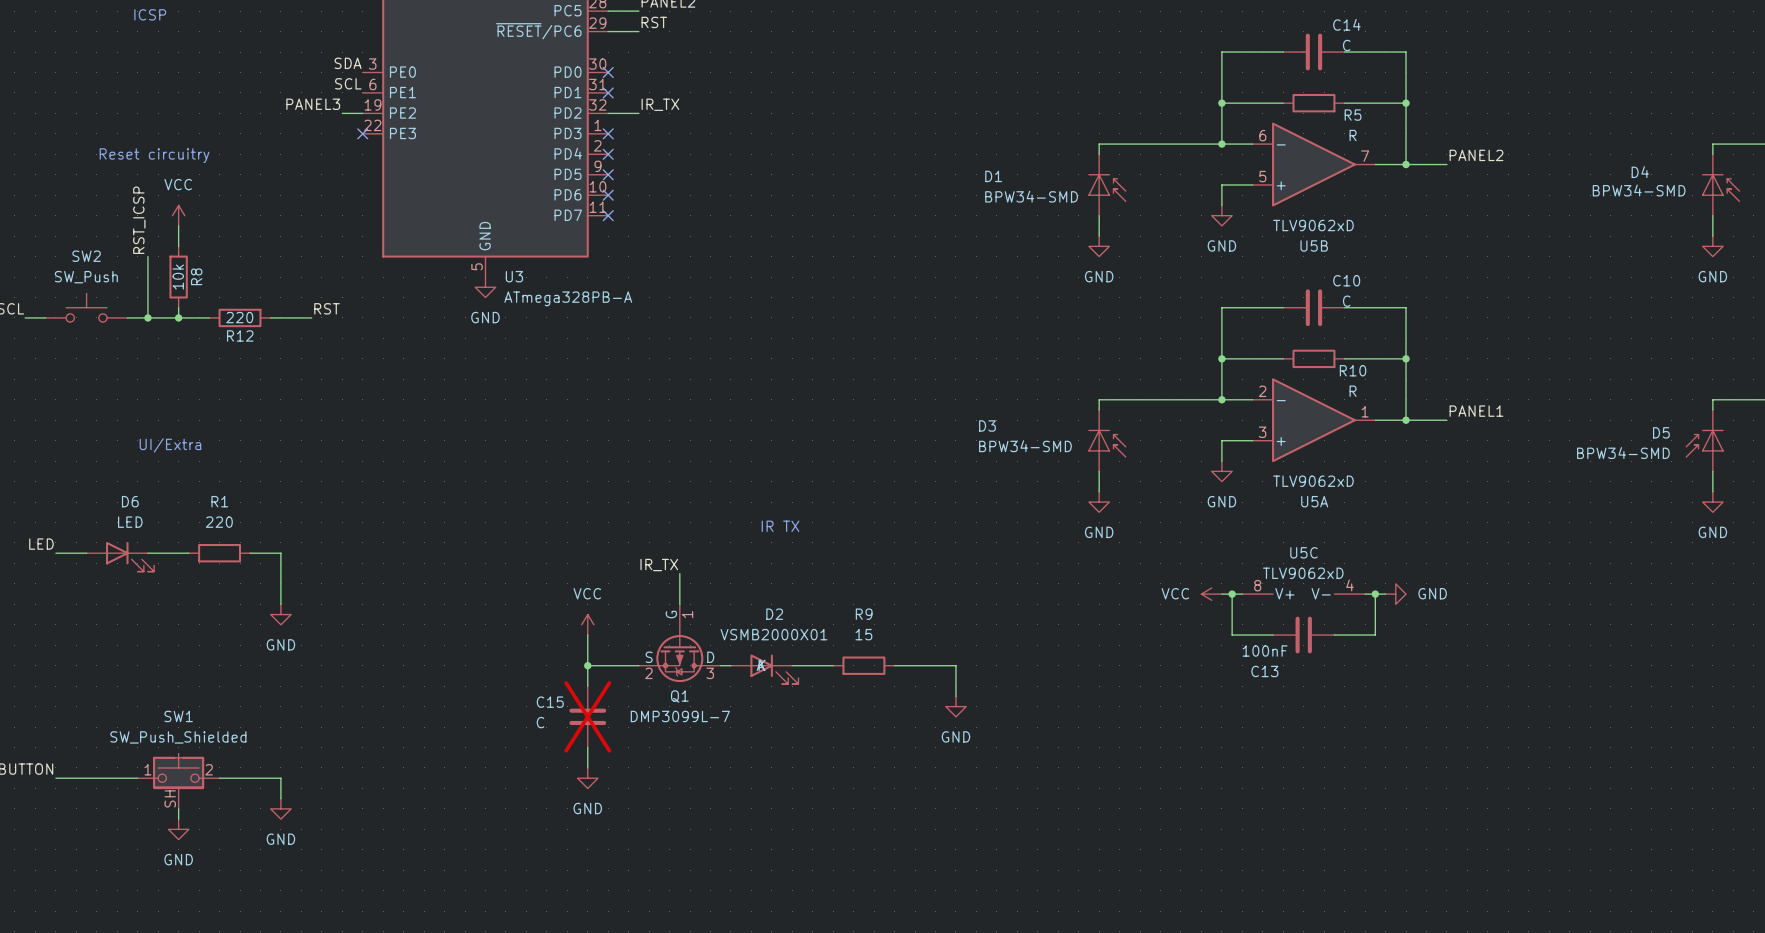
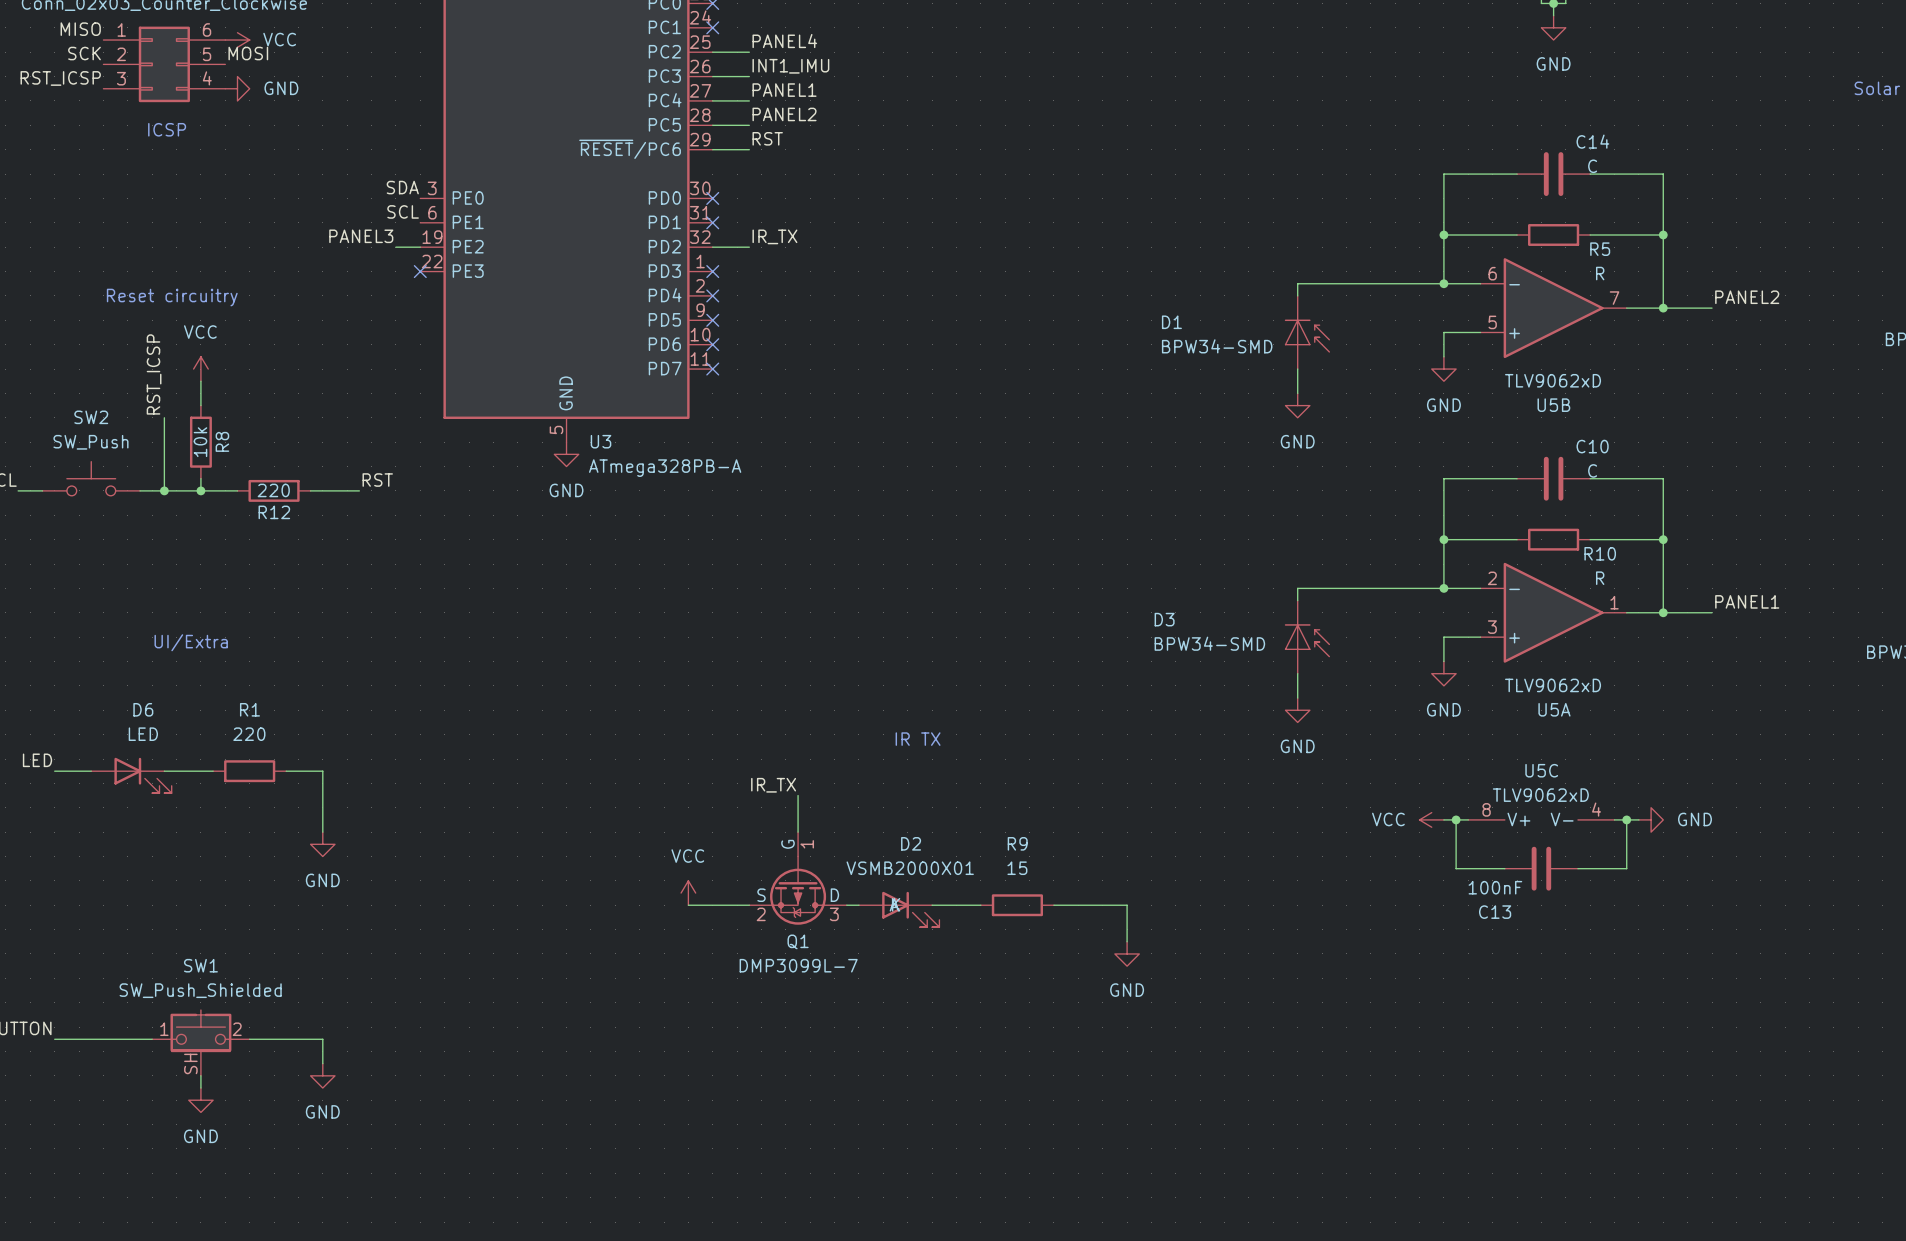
power symbol position: VCC (587, 624) -> VCC (688, 893)
wire: (587, 635) (587, 686) -> none
junction: (587, 665) -> none
C15: C (587, 716) -> none
wire: (587, 747) (587, 767) -> none
power symbol: GND (587, 778) -> none

